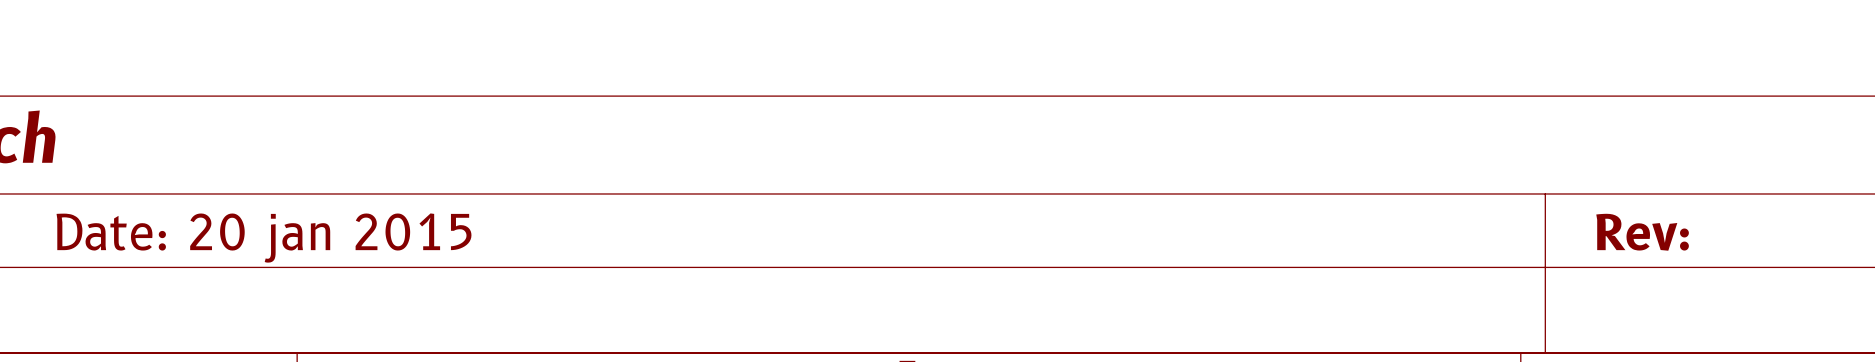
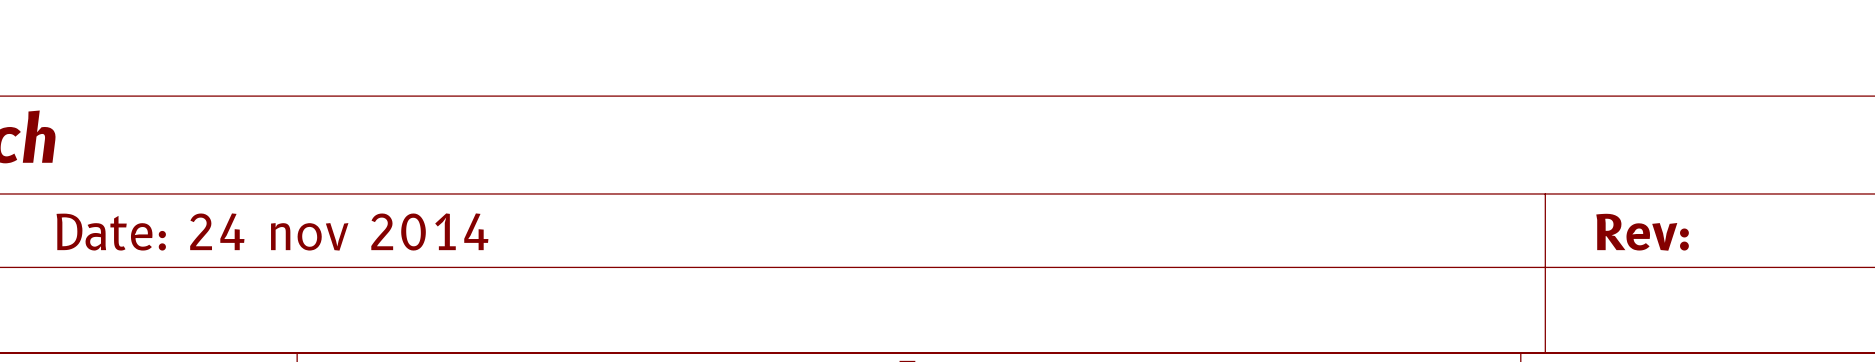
title block: Date: 20 jan 2015 (264, 238) -> Date: 24 nov 2014 (272, 232)

